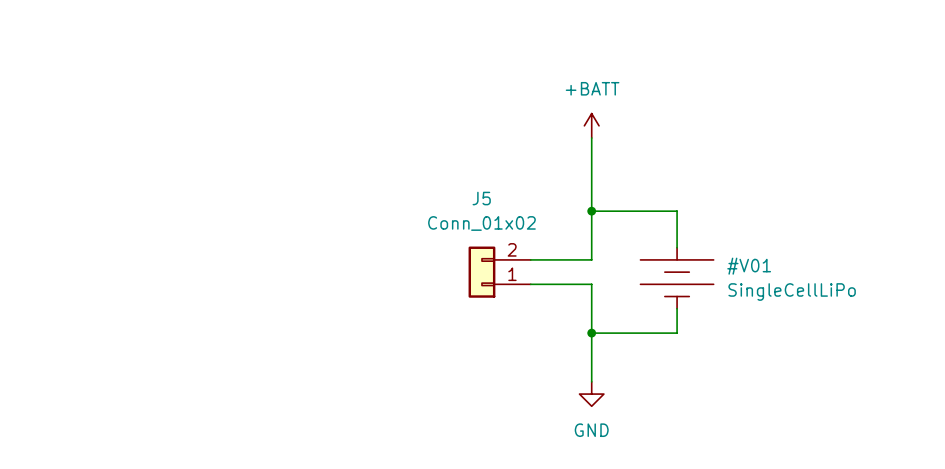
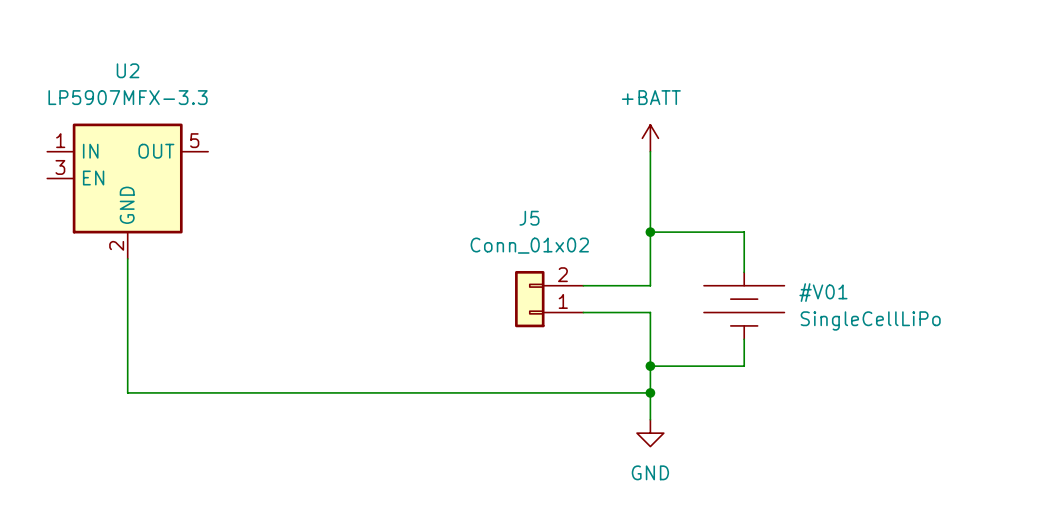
U2: none -> LP5907MFX-3.3 (127, 191)
wire: none -> (127, 258) (127, 392) (650, 392)
junction: none -> (650, 392)

